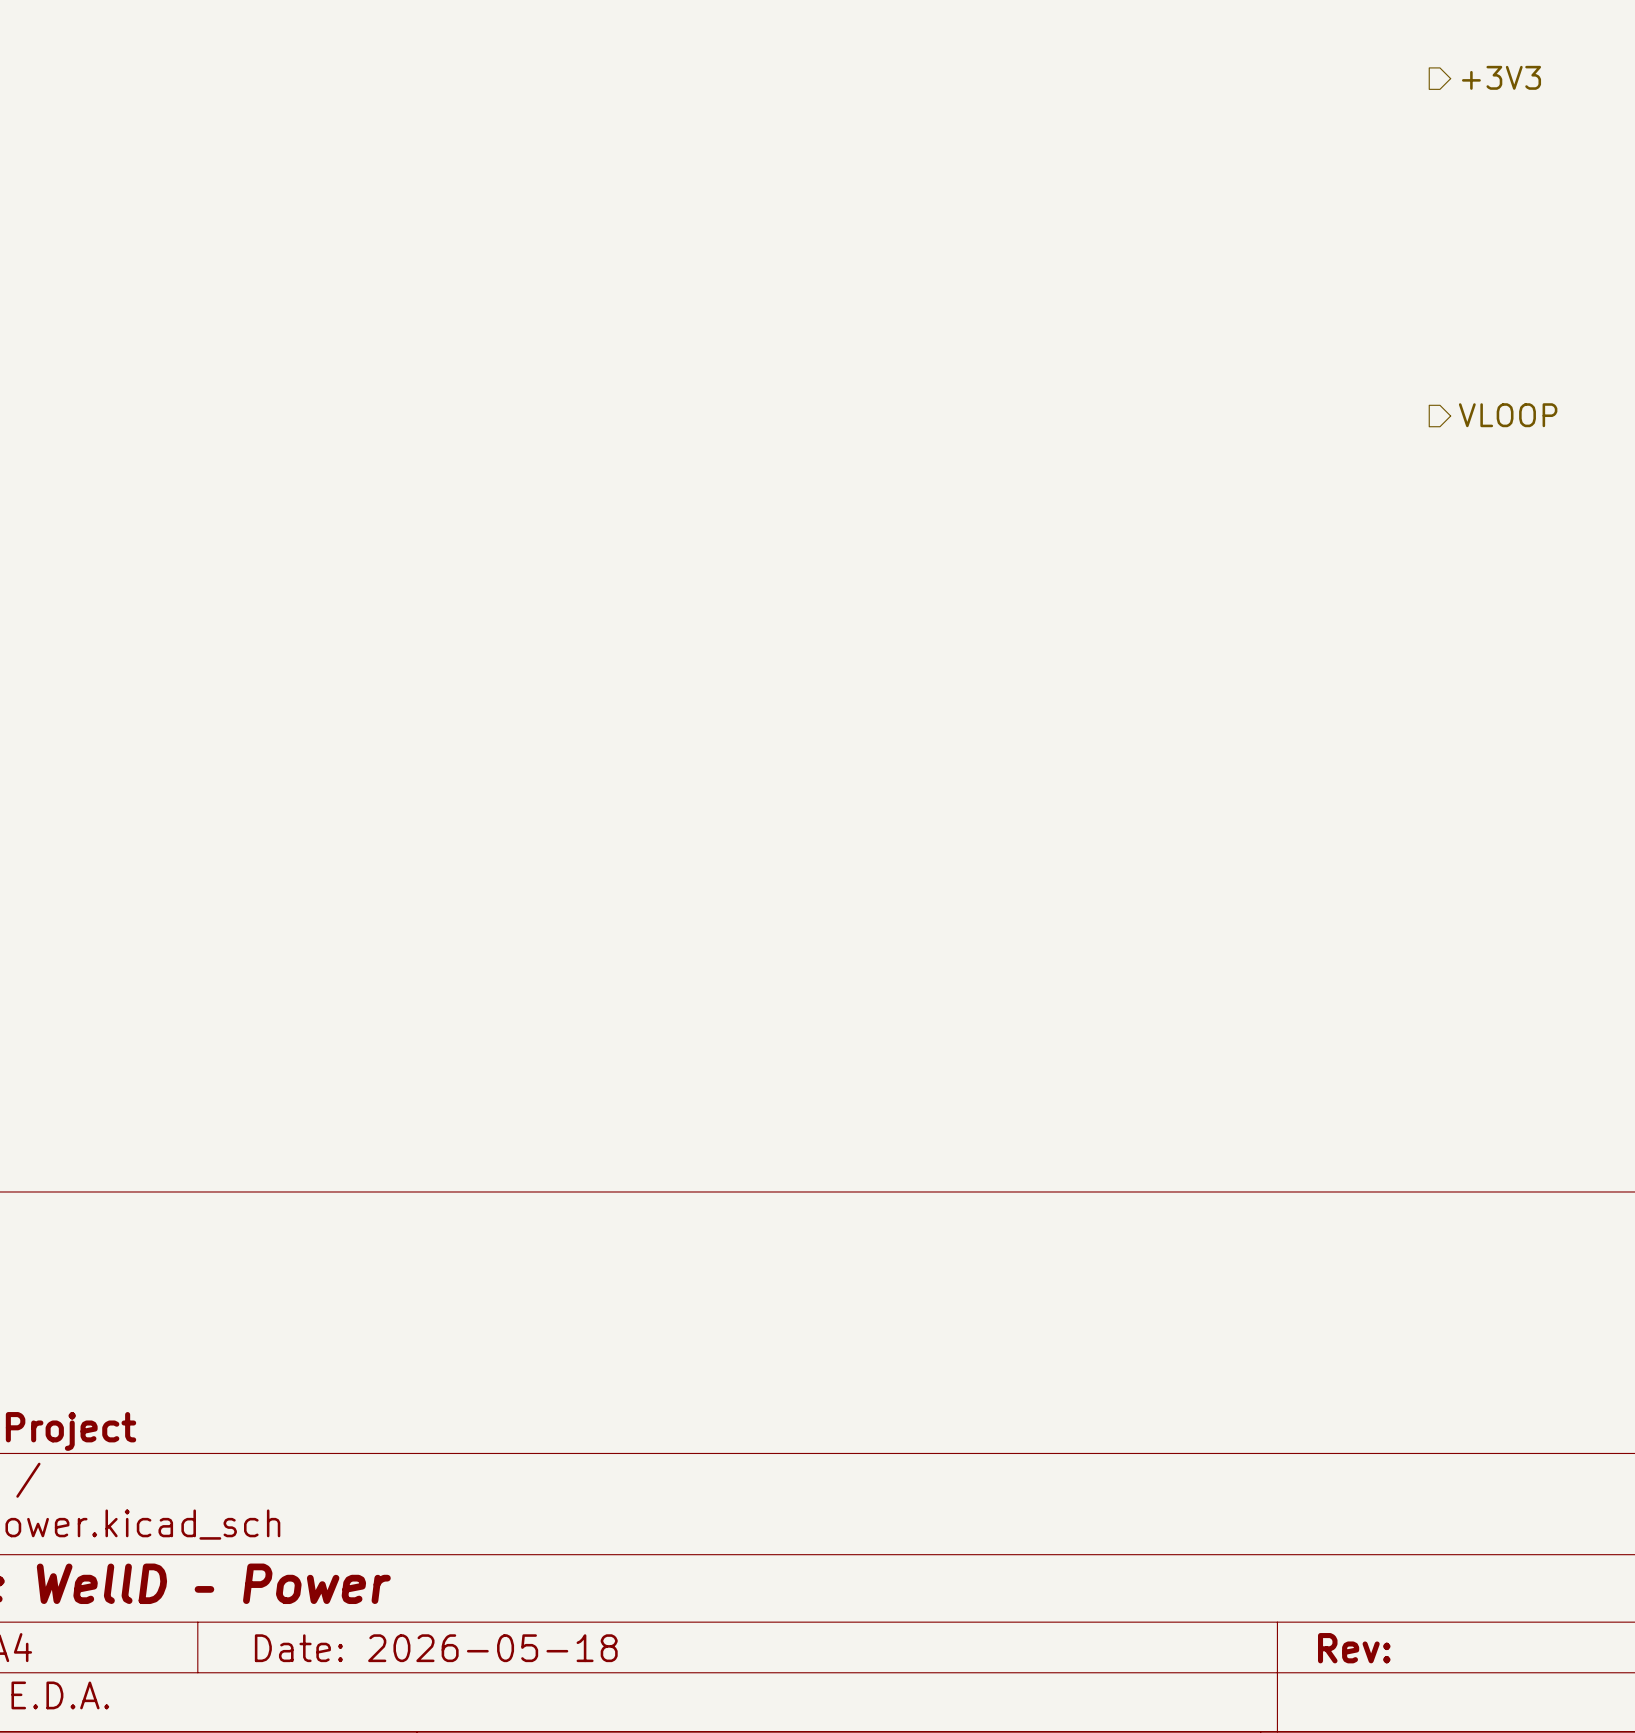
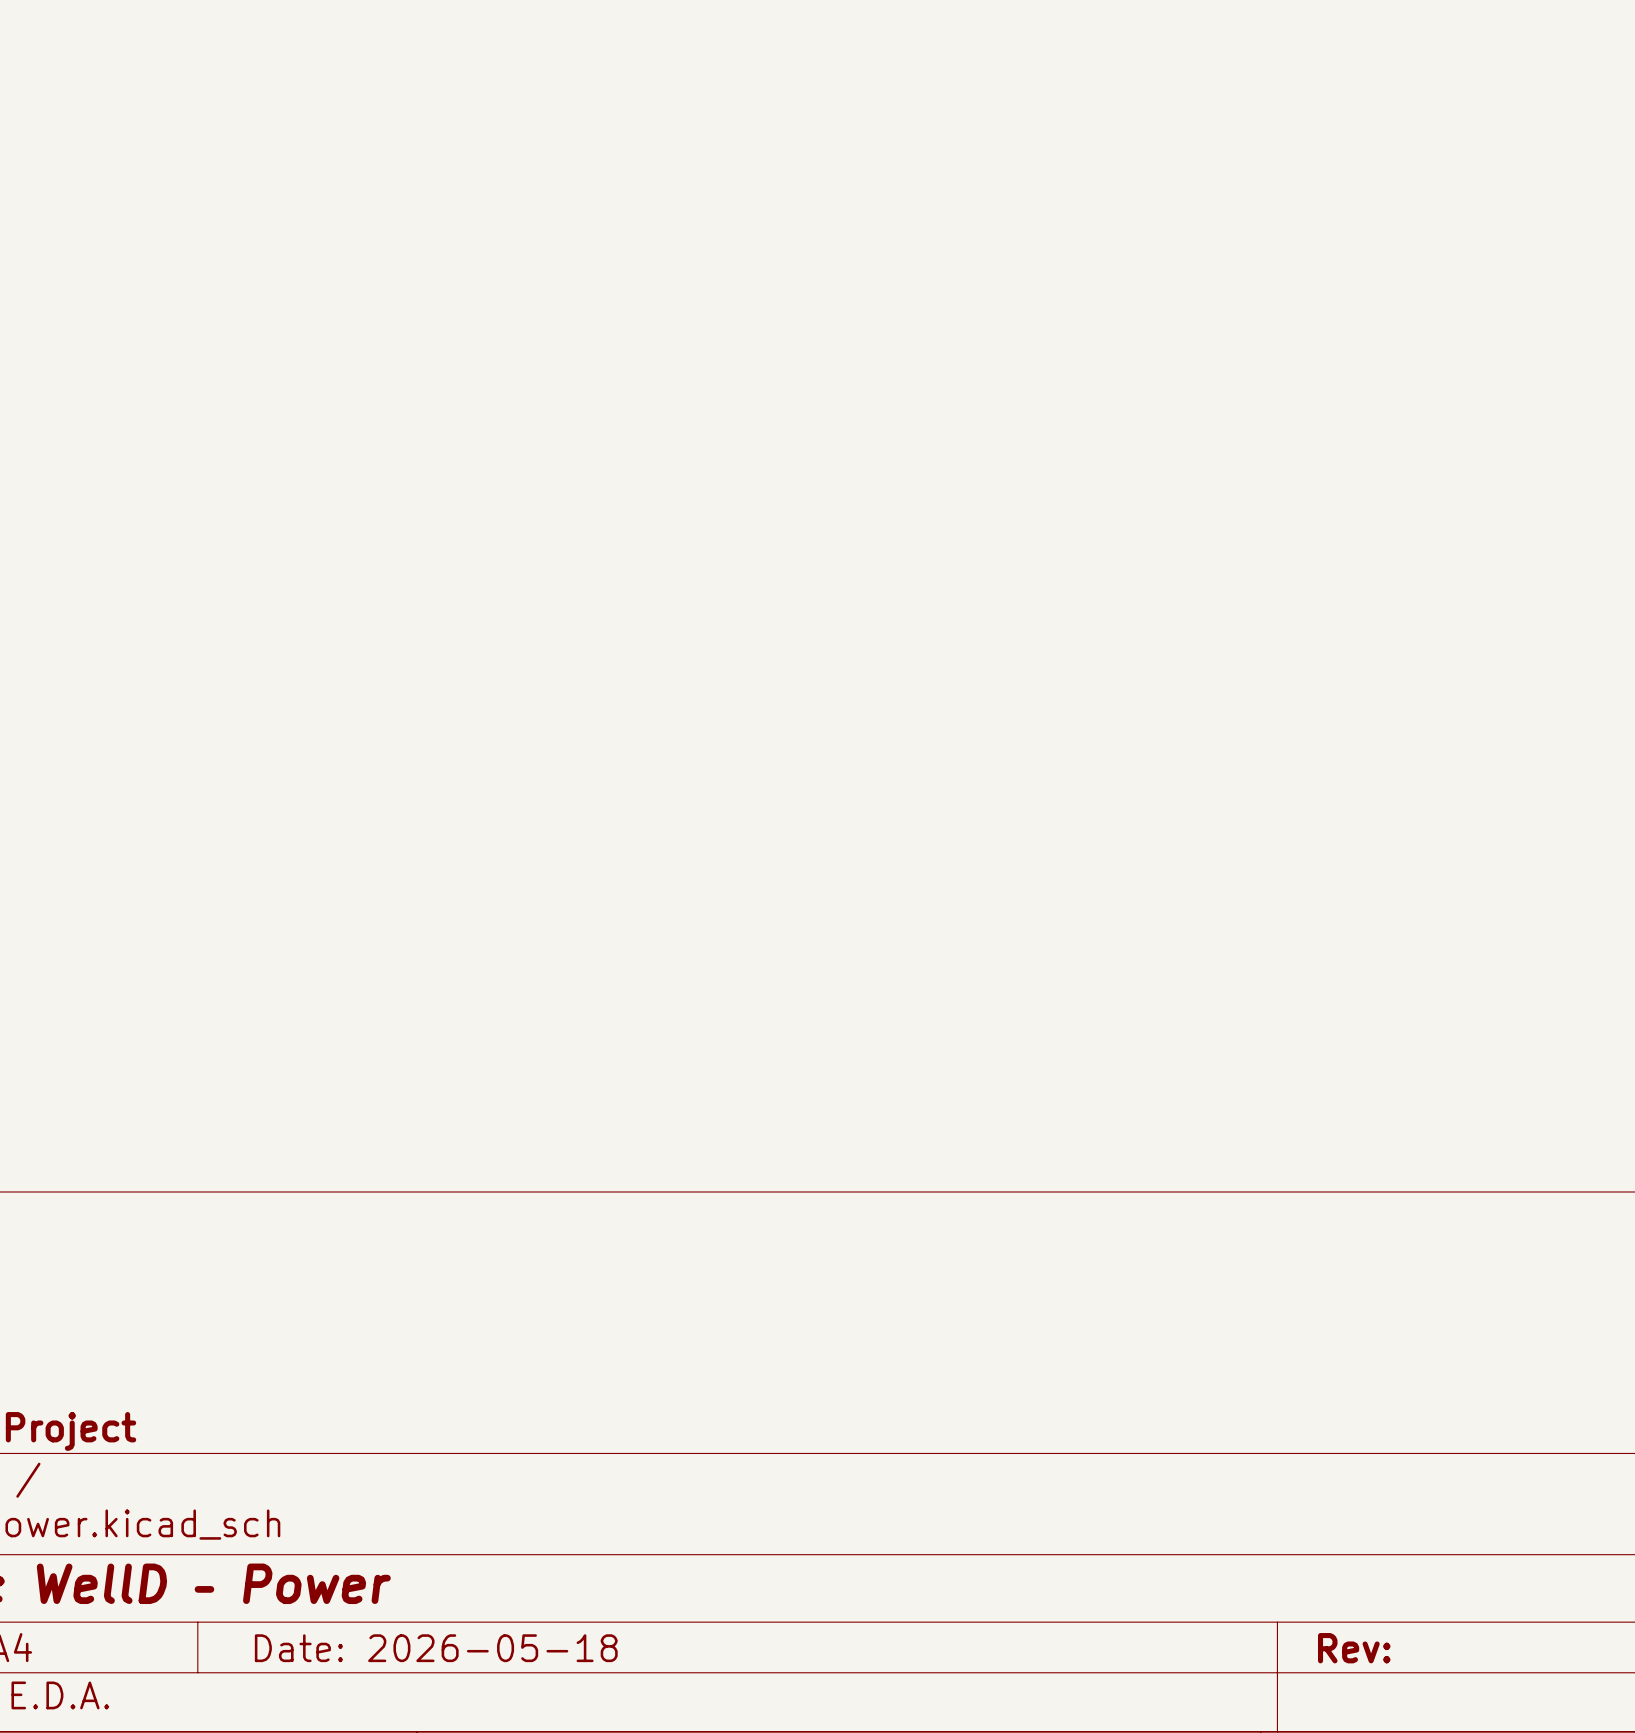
hierarchical label: +3V3 (1501, 77) -> none
hierarchical label: VLOOP (1508, 415) -> none

